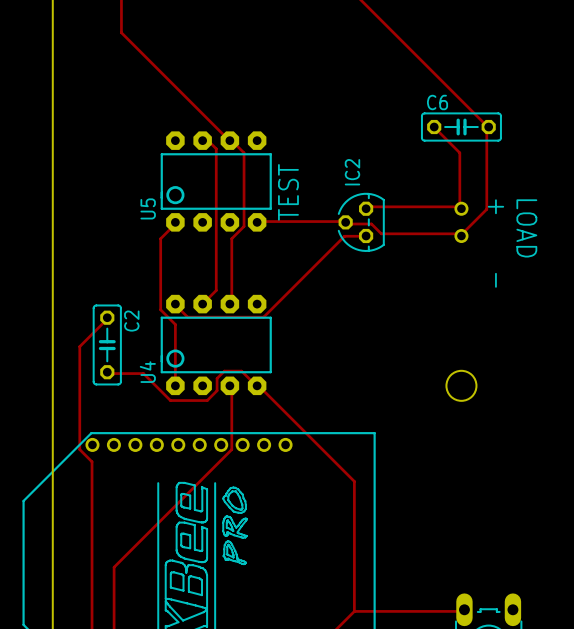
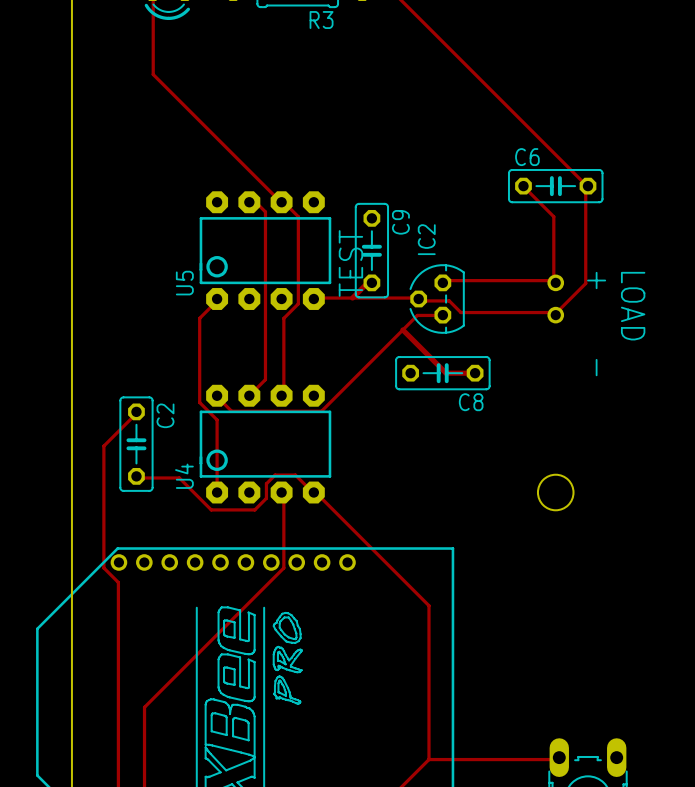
C9: none -> (371, 250)
track: none -> (371, 282) (367, 282) (352, 298)
track: none -> (402, 329) (446, 373) (475, 373)
C8: none -> (442, 373)

